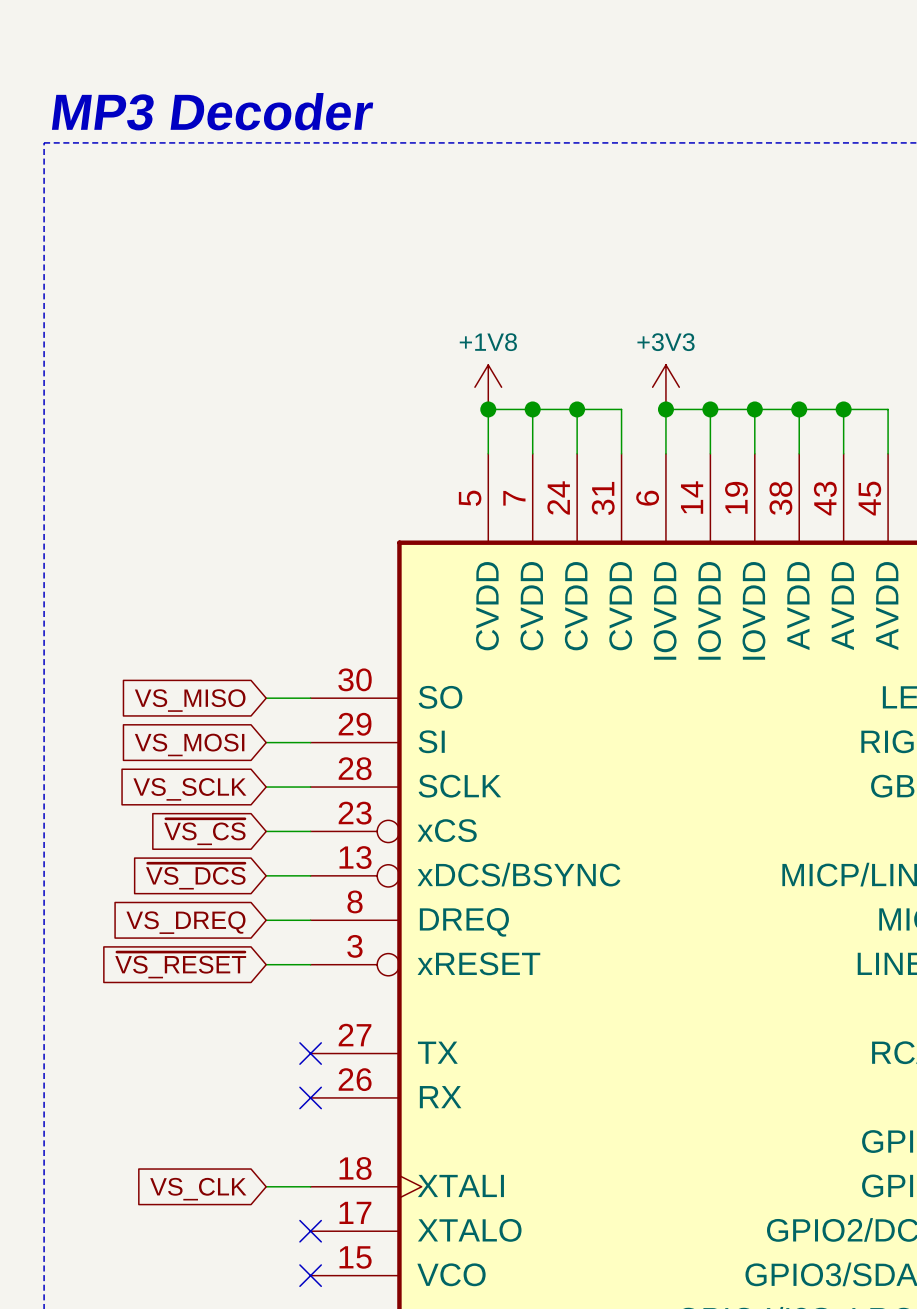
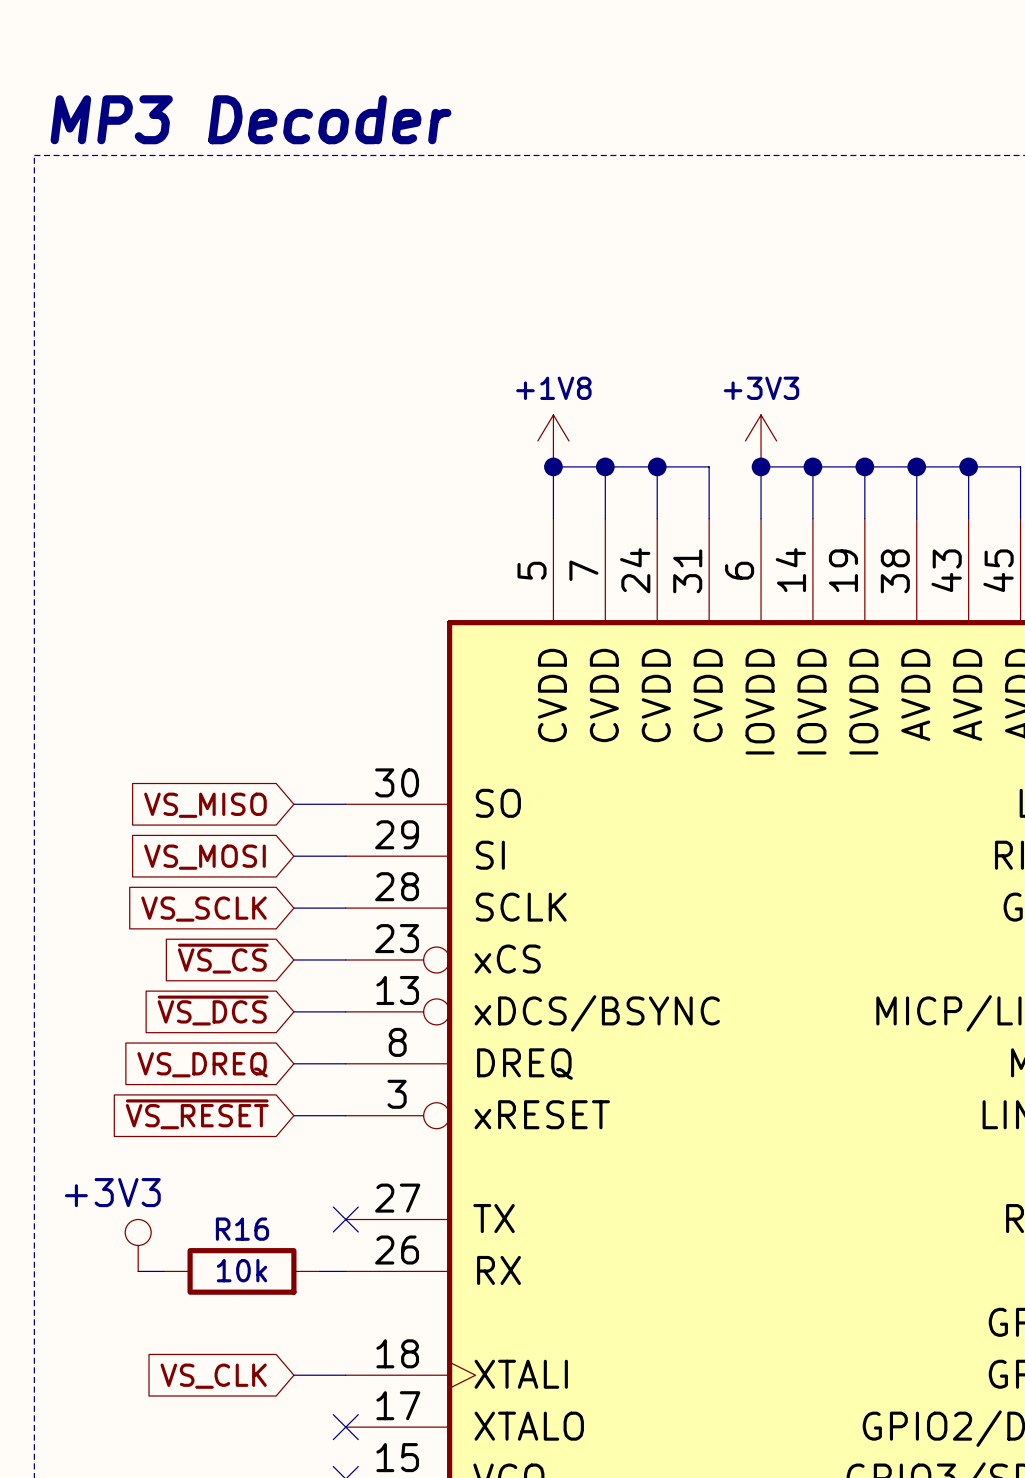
power symbol: none -> +3V3 (138, 1245)
wire: none -> (138, 1271) (164, 1271)
R16: none -> 10k (241, 1271)
wire: none -> (319, 1271) (345, 1271)
no-connect mark: (310, 1097) -> none

